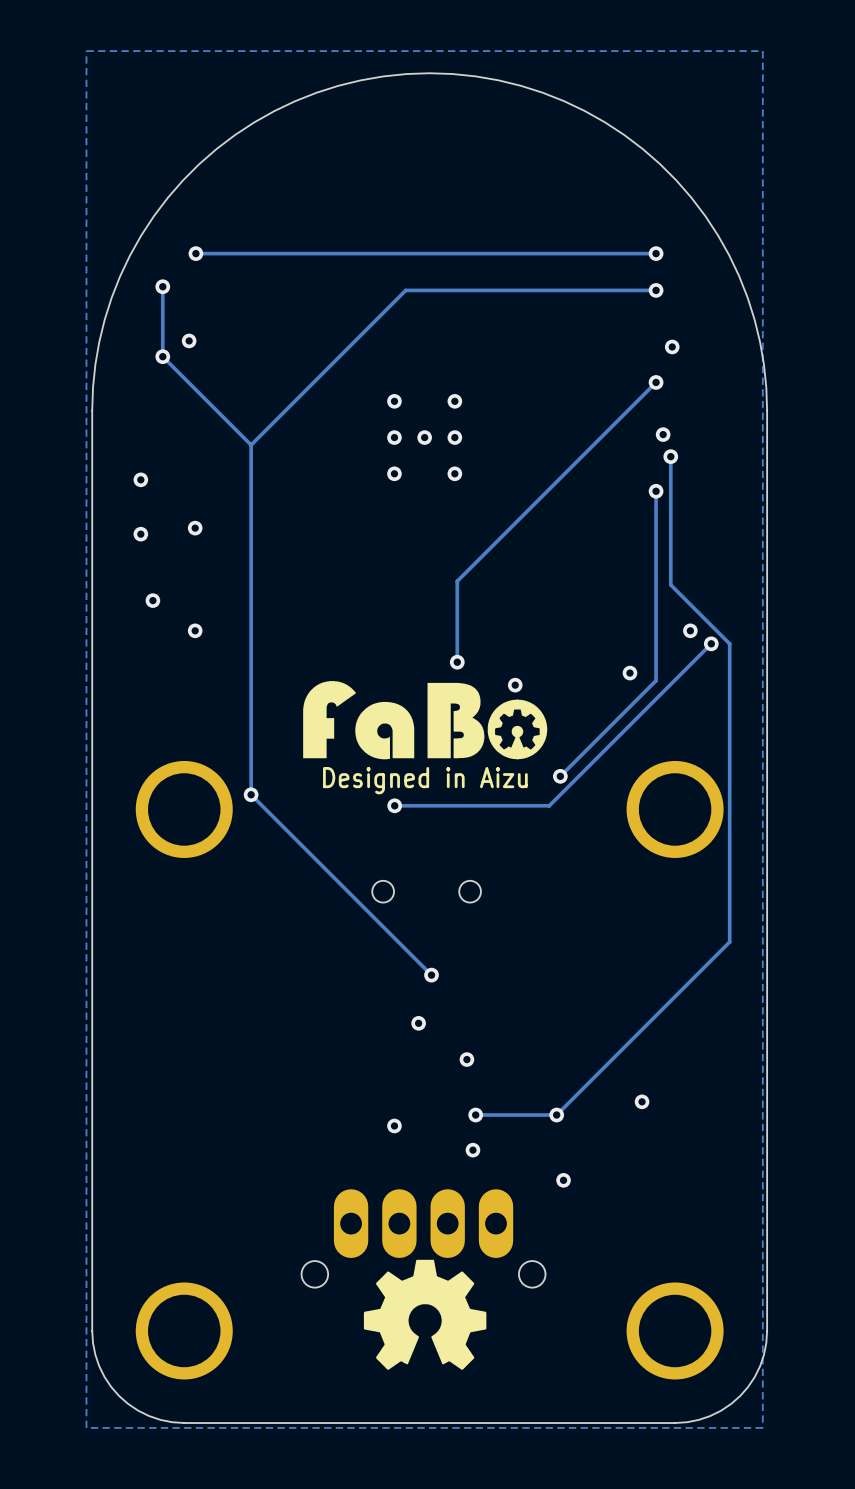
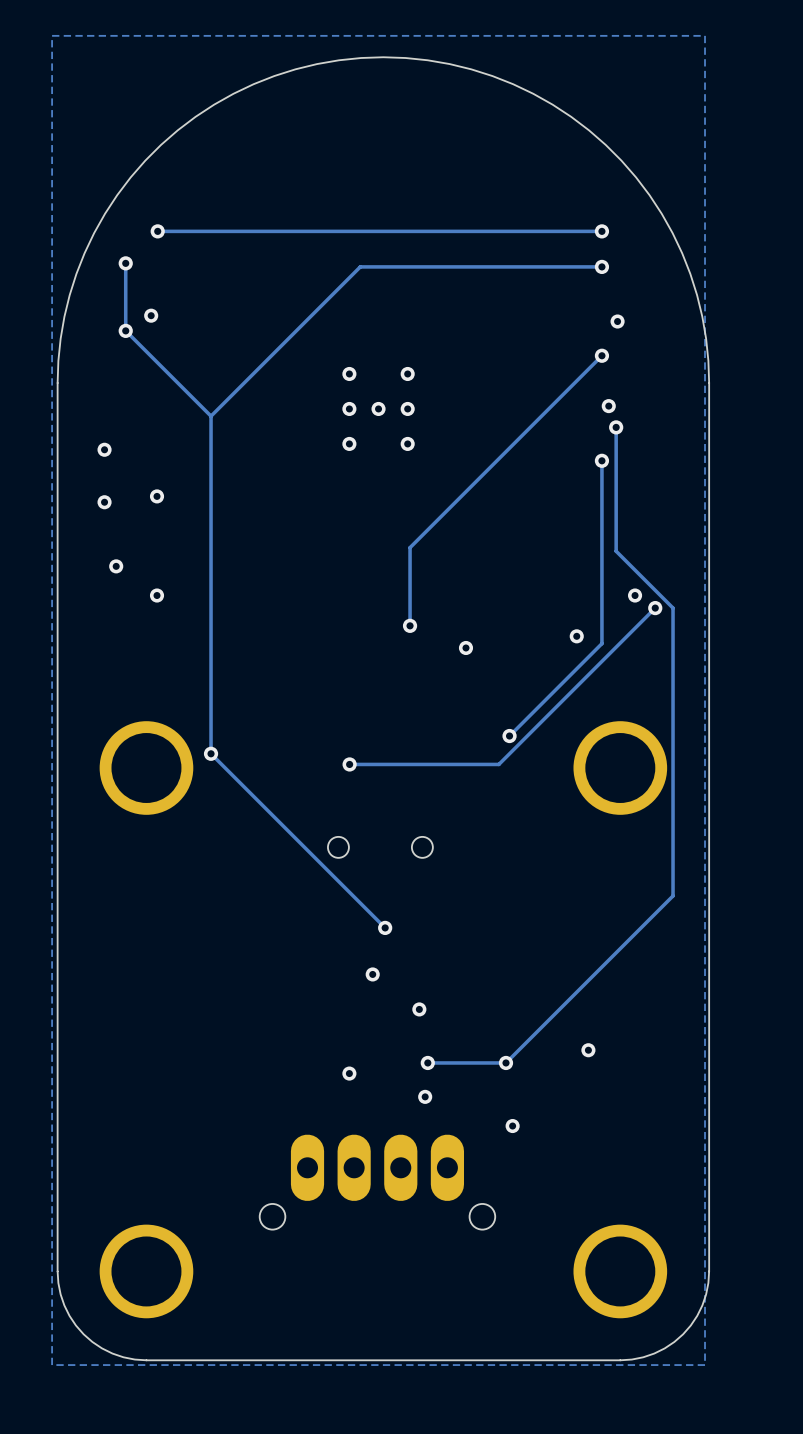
drawing: [303, 681, 548, 760] -> none
text: Designed in Aizu (425, 780) -> none
drawing: [363, 1259, 487, 1370] -> none

